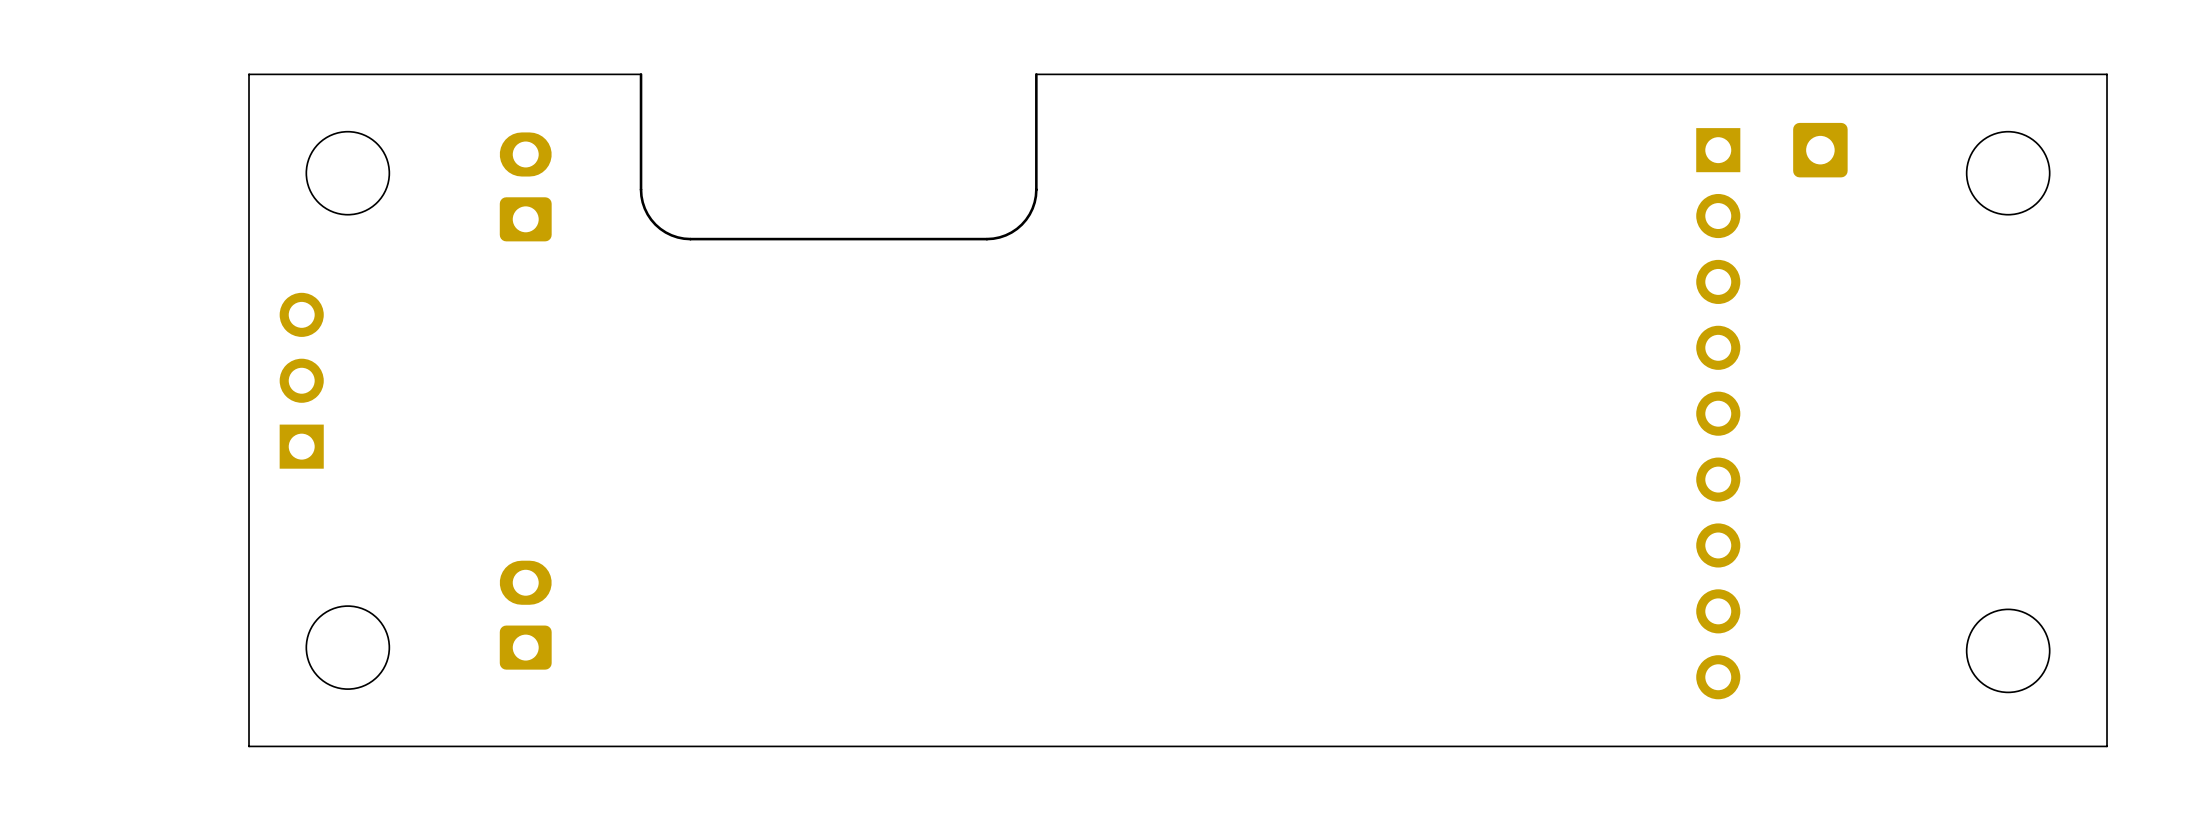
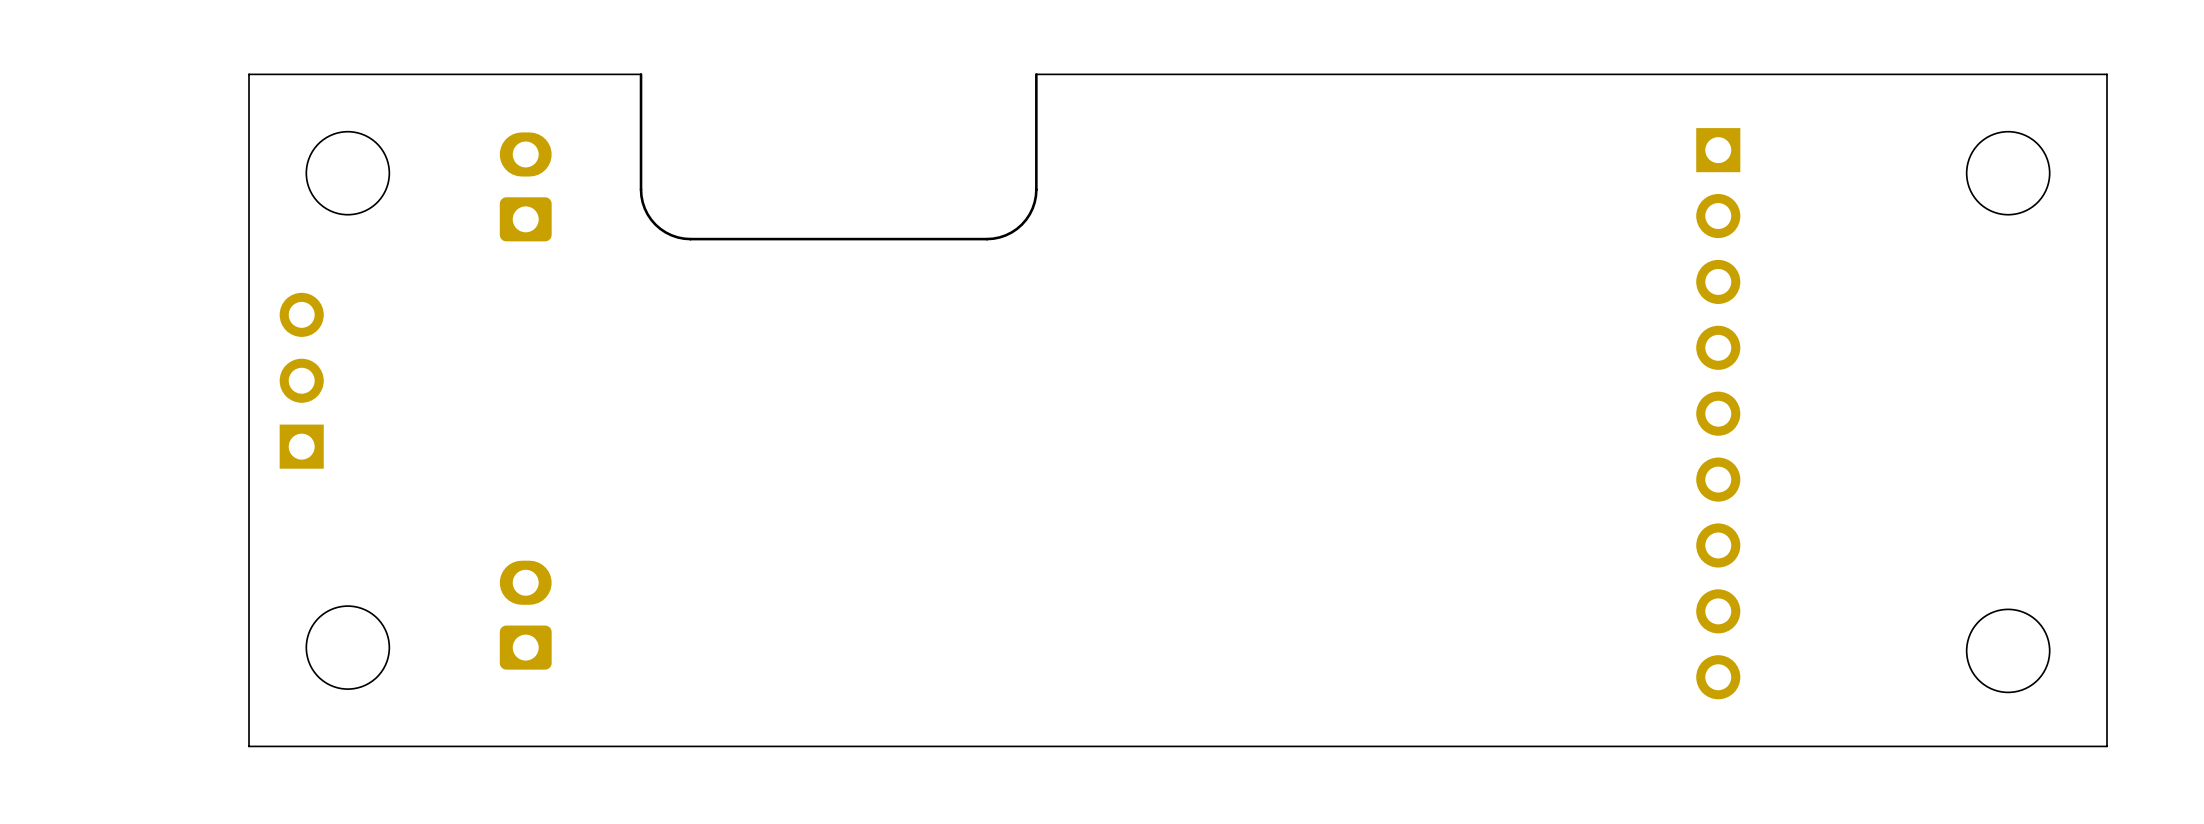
part: (1820, 150) -> none

